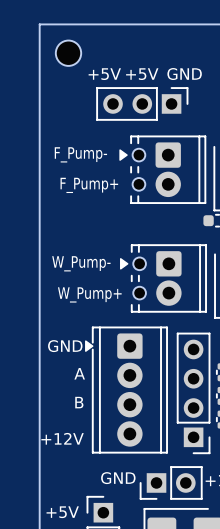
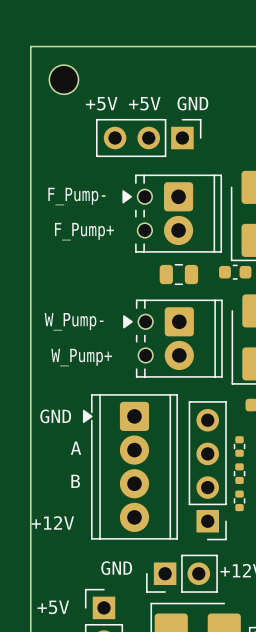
part: none -> (178, 274)

